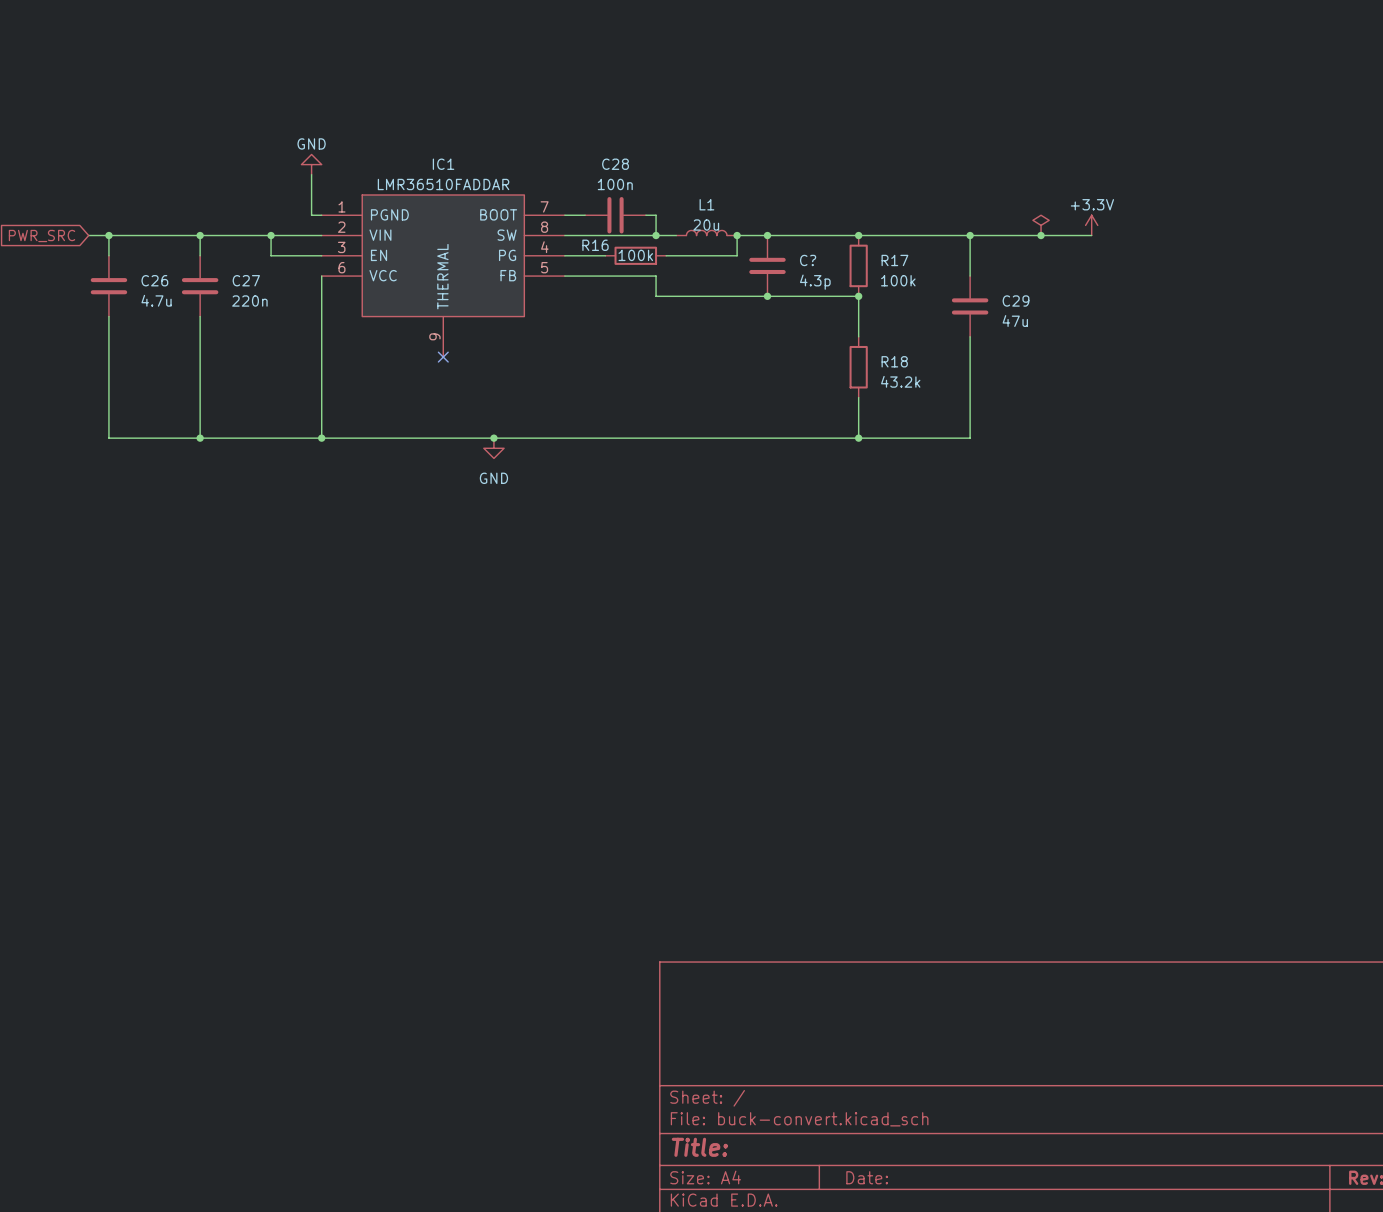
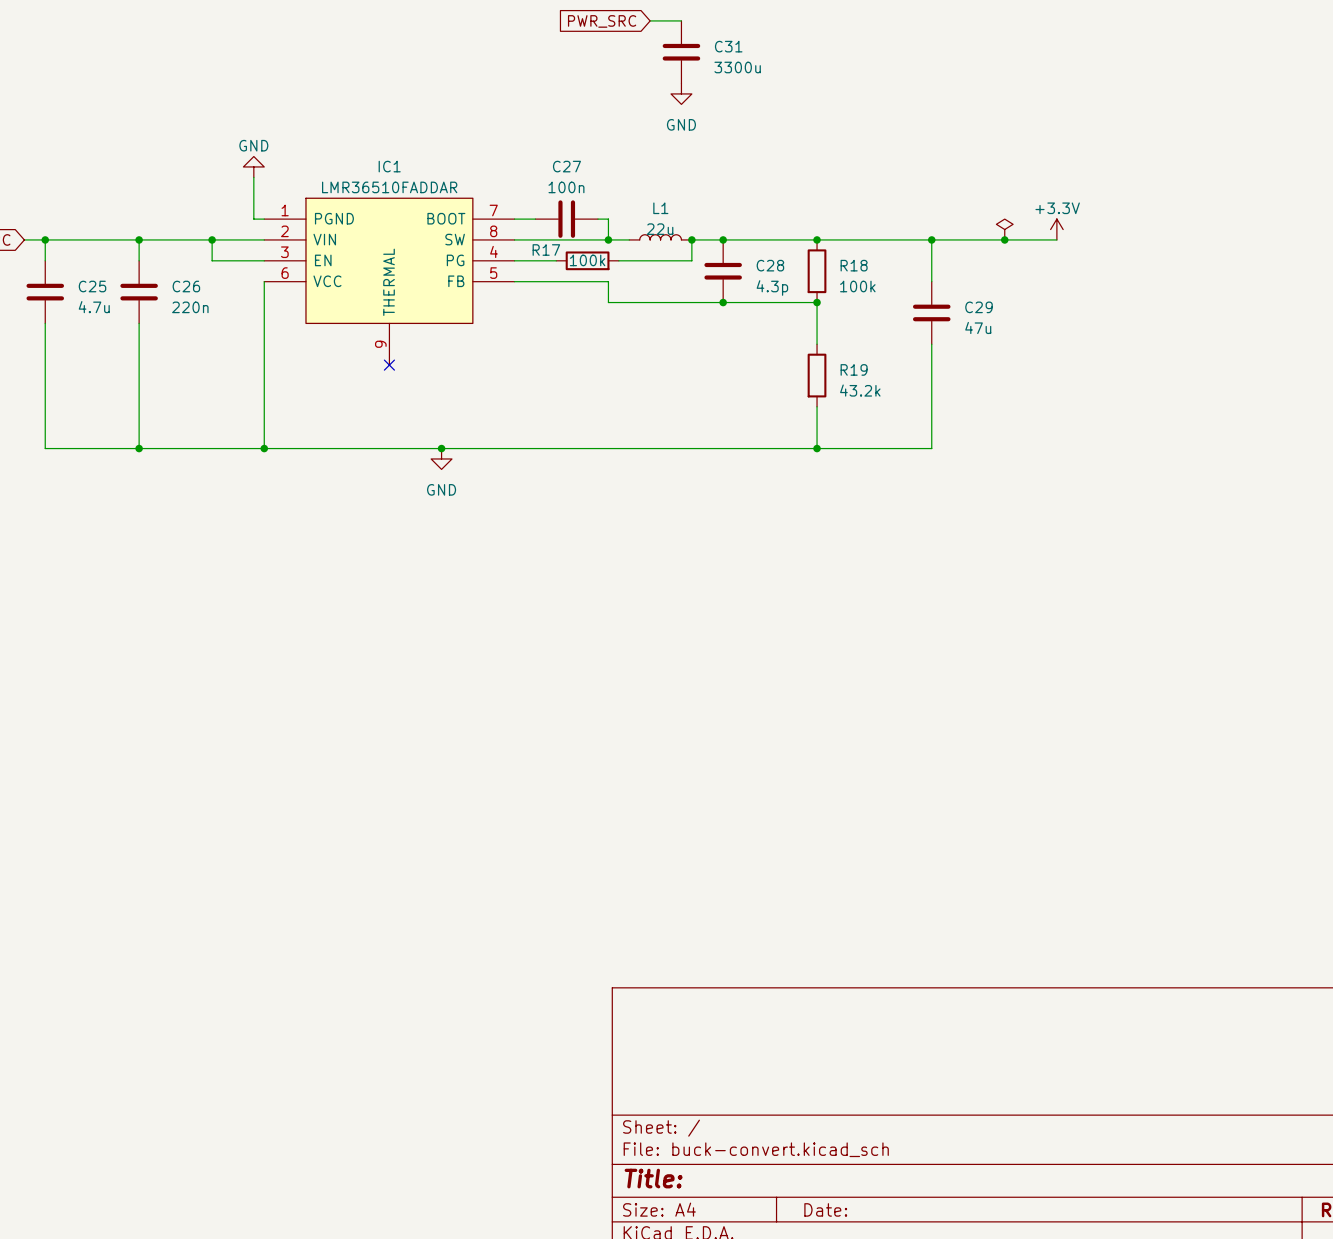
wire: none -> (650, 20) (681, 20)
global label: none -> PWR_SRC (602, 21)
C31: none -> 3300u (681, 52)
power symbol: none -> GND (681, 93)
C28 name: C28 (615, 164) -> C27 (566, 166)
L1 value: 20u (706, 225) -> 22u (660, 229)
R16 name: R16 (595, 245) -> R17 (546, 250)
C? name: C? (808, 260) -> C28 (770, 265)
R17 name: R17 (894, 260) -> R18 (854, 265)
C26 name: C26 (154, 280) -> C25 (92, 286)
C27 name: C27 (246, 280) -> C26 (186, 286)
R18 name: R18 (894, 361) -> R19 (854, 369)

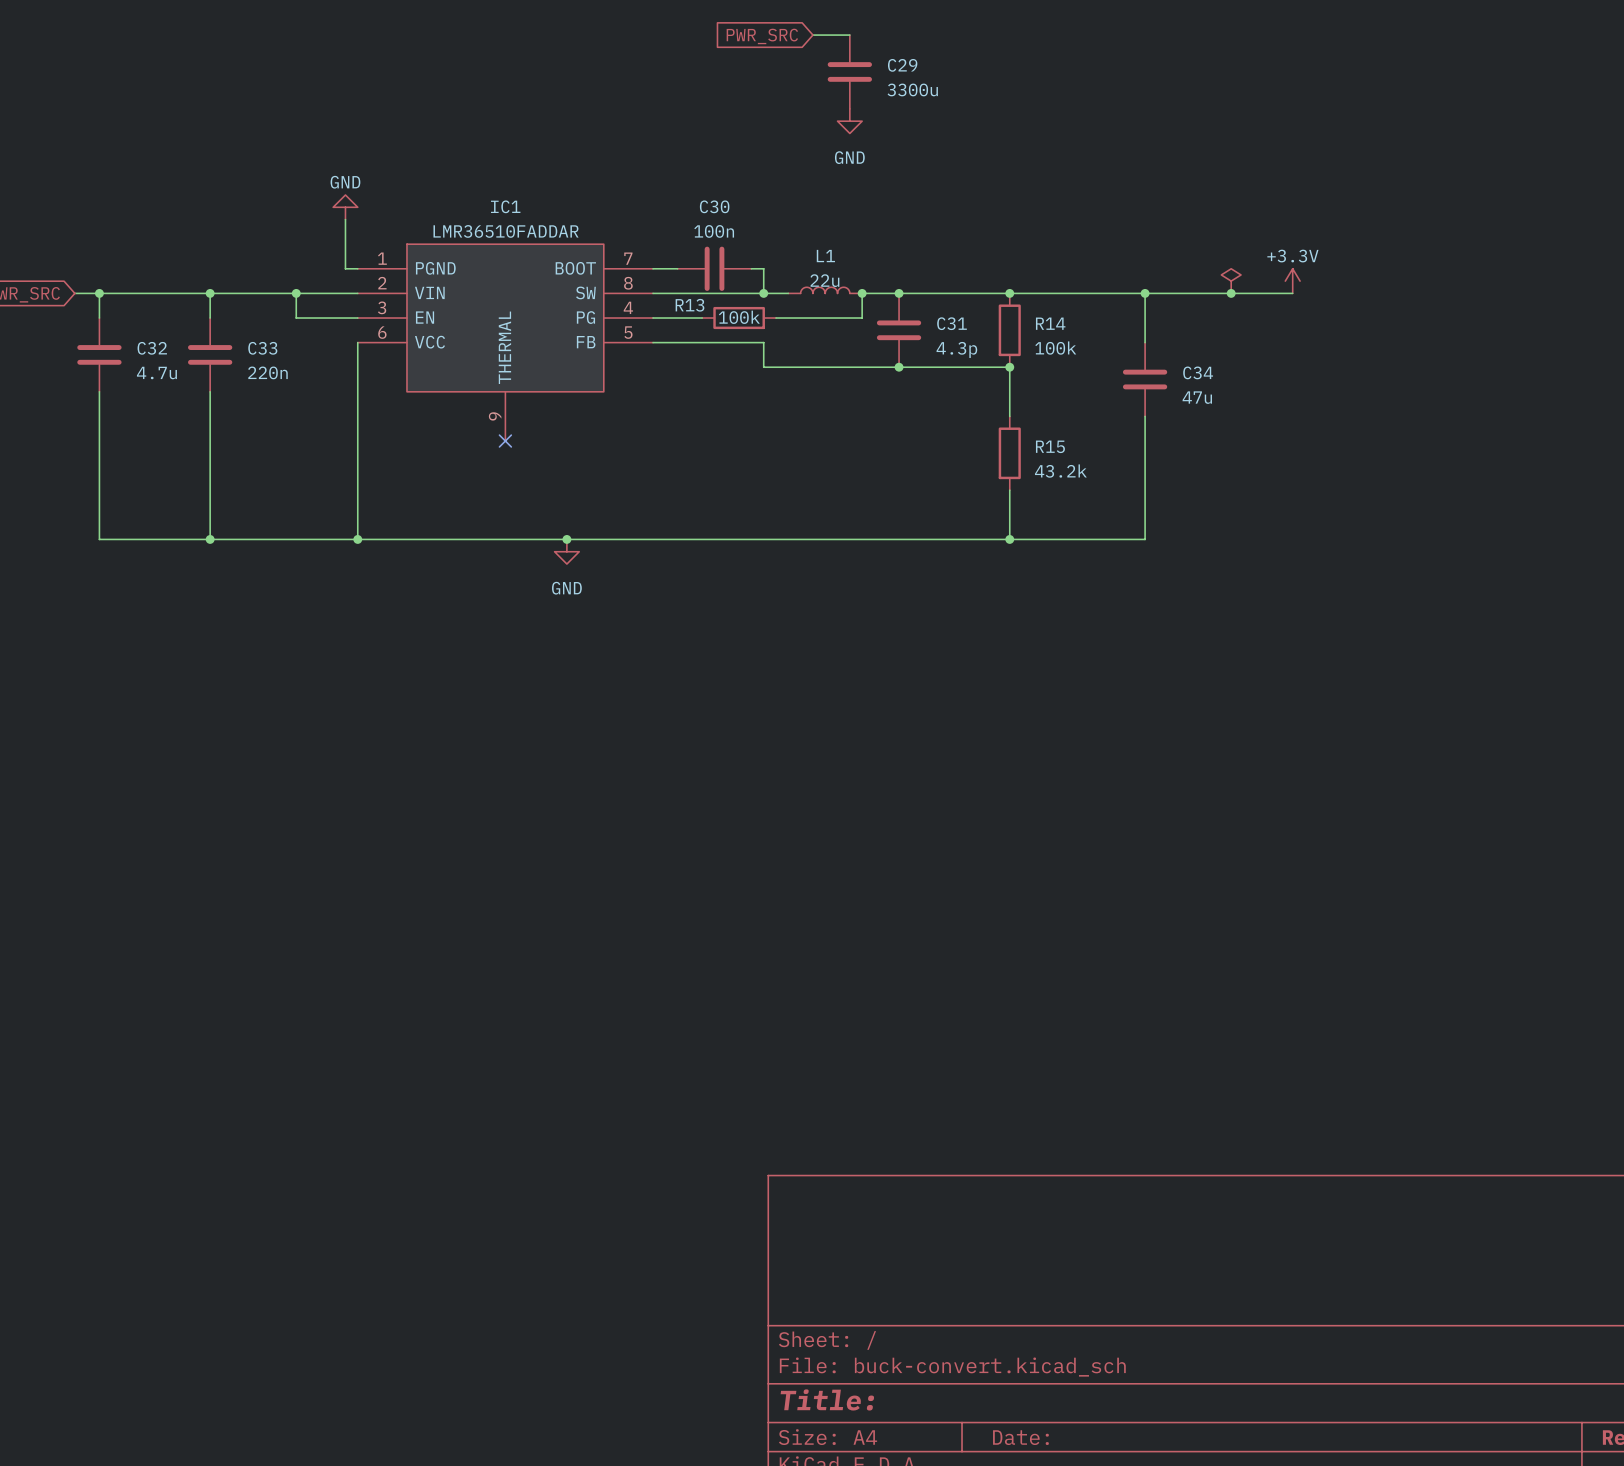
C31 name: C31 (728, 46) -> C29 (902, 65)
C27 name: C27 (566, 166) -> C30 (714, 206)
R17 name: R17 (546, 250) -> R13 (689, 305)
C28 name: C28 (770, 265) -> C31 (952, 323)
R18 name: R18 (854, 265) -> R14 (1050, 323)
C25 name: C25 (92, 286) -> C32 (152, 348)
C26 name: C26 (186, 286) -> C33 (262, 348)
C29 name: C29 (979, 307) -> C34 (1198, 372)
R19 name: R19 (854, 369) -> R15 (1050, 446)

